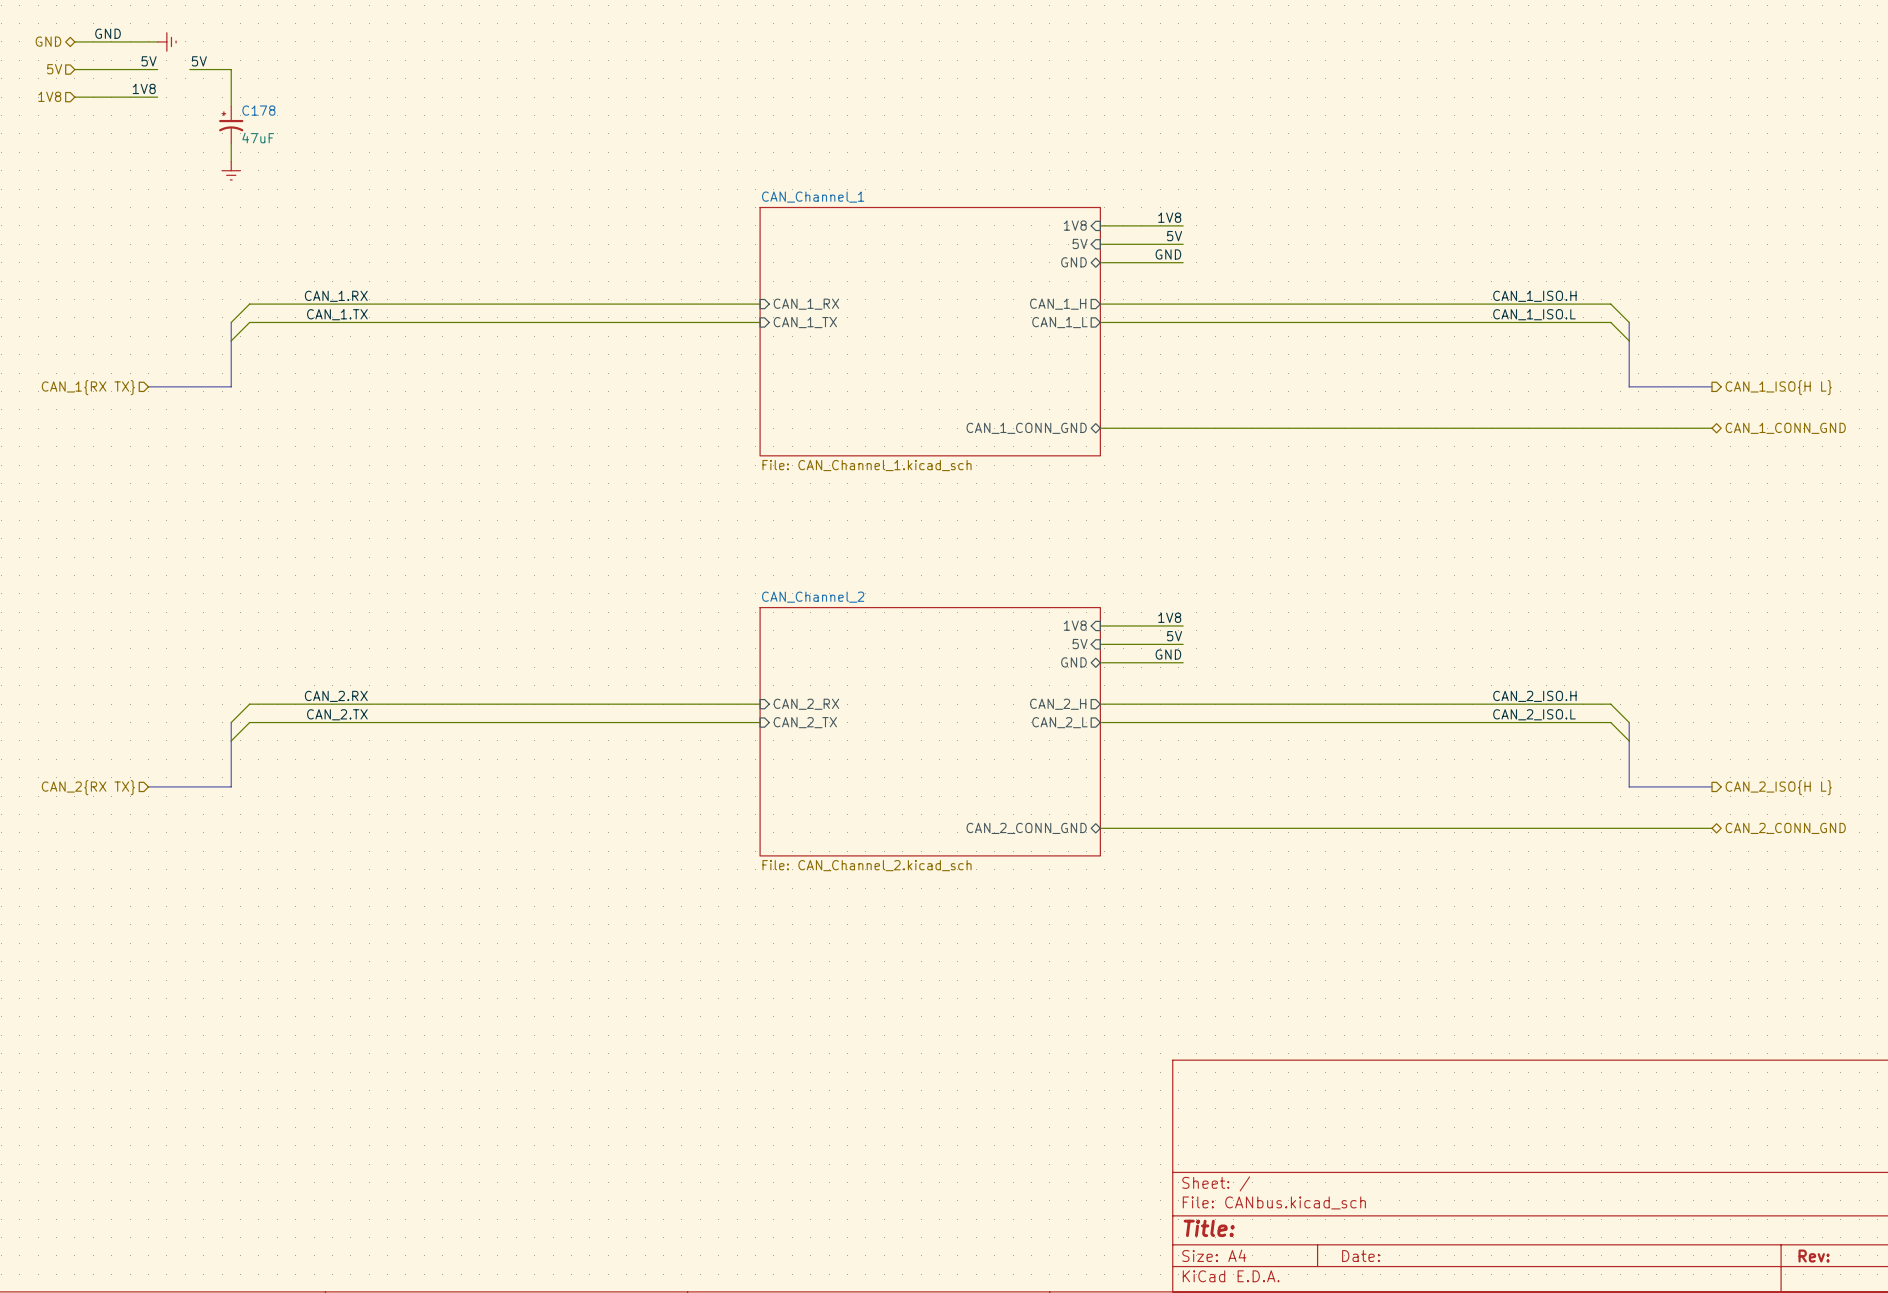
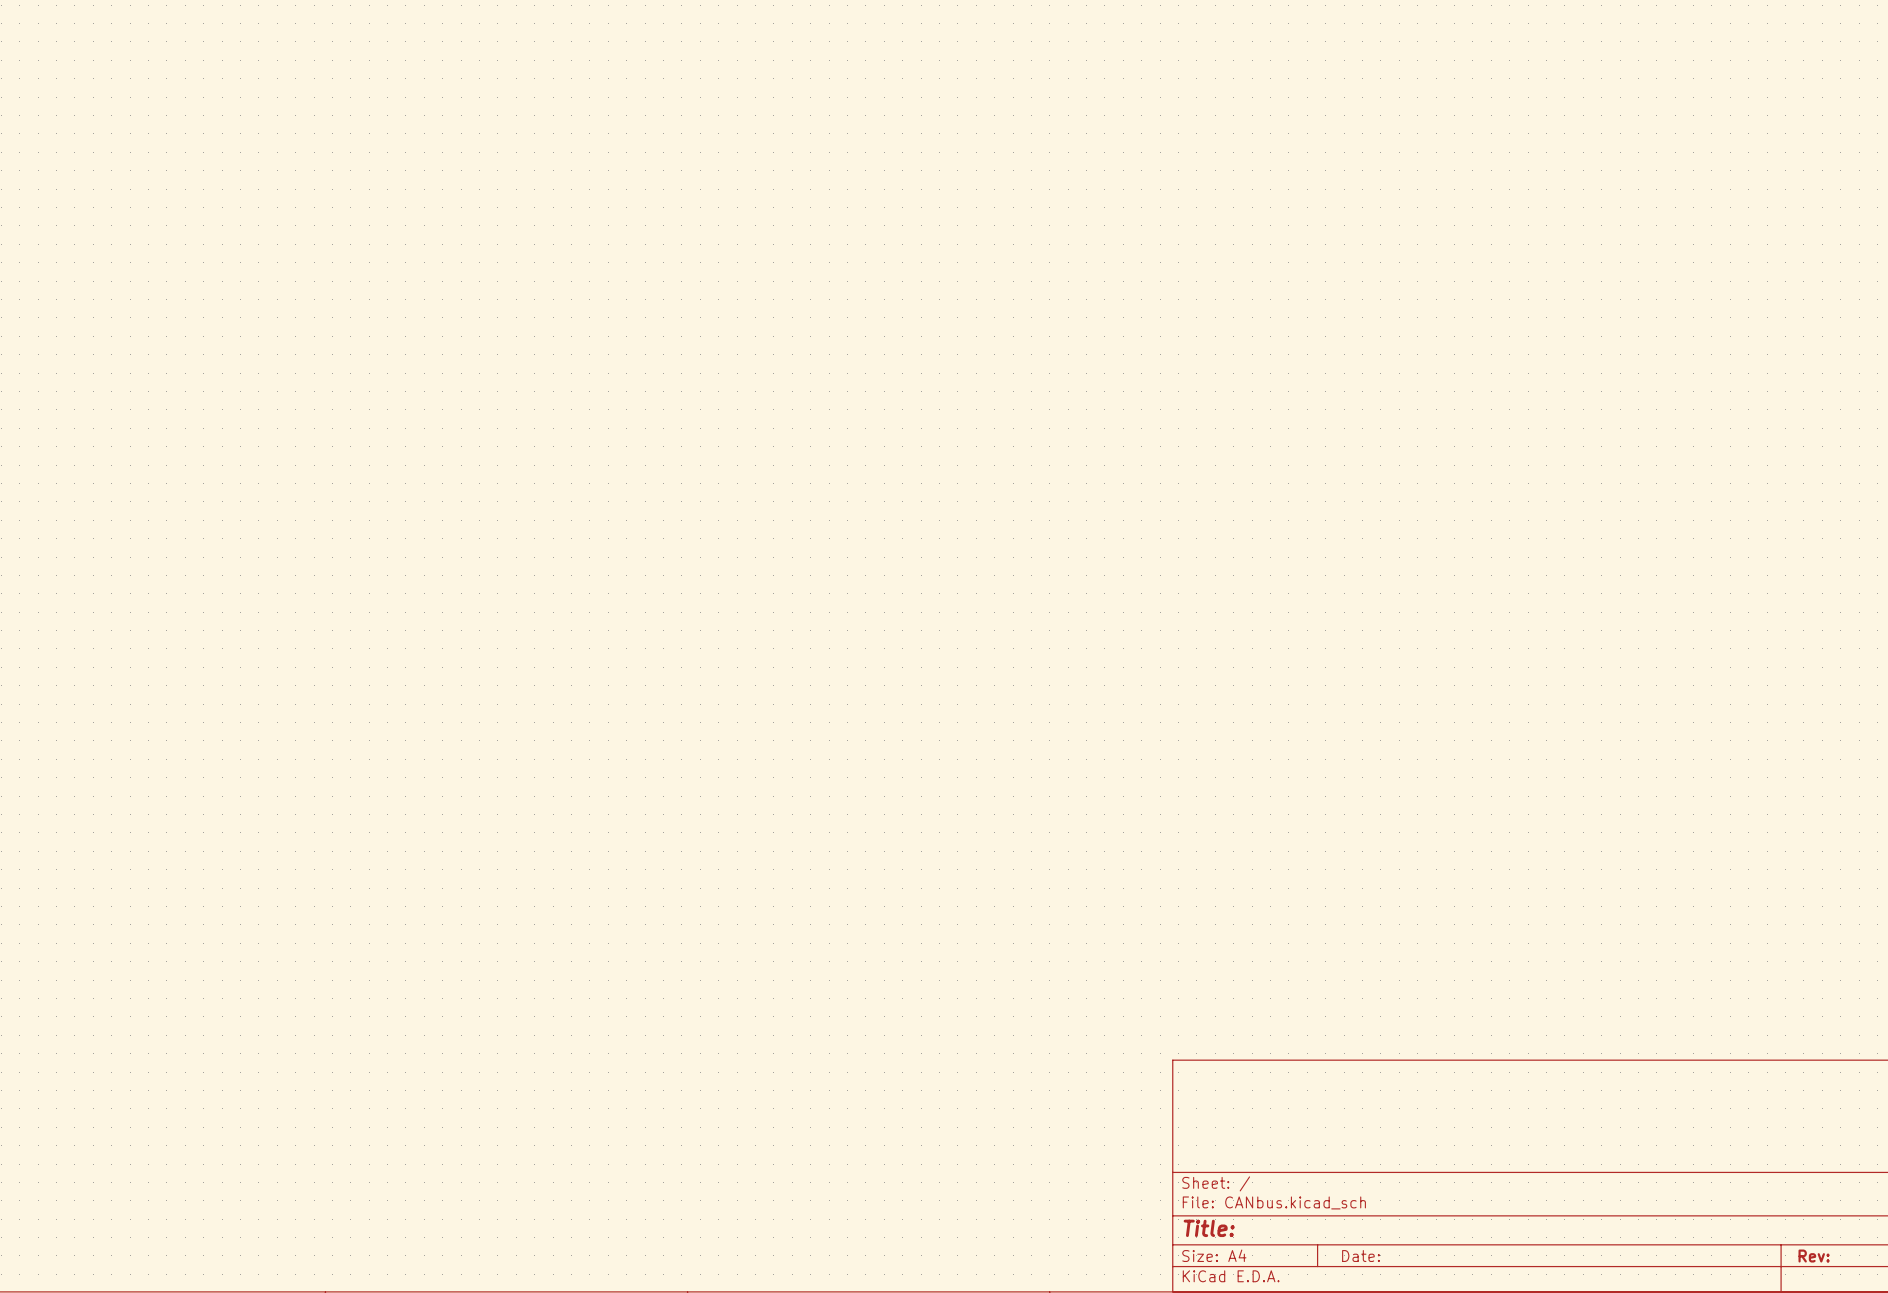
label: GND (108, 33) -> none
hierarchical label: GND (48, 41) -> none
wire: (74, 41) (157, 41) -> none
power symbol: (166, 41) -> none
label: 5V (149, 61) -> none
label: 5V (199, 61) -> none
hierarchical label: 5V (54, 69) -> none
wire: (74, 69) (157, 69) -> none
wire: (189, 69) (231, 69) (231, 106) -> none
label: 1V8 (144, 88) -> none
hierarchical label: 1V8 (49, 96) -> none
wire: (74, 97) (157, 97) -> none
C178: 47uF (231, 124) -> none
wire: (231, 143) (231, 161) -> none
power symbol: (231, 170) -> none
label: 1V8 (1169, 217) -> none
sheet pin: 1V8 (1075, 225) -> none
wire: (1100, 225) (1183, 225) -> none
label: 5V (1174, 236) -> none
sheet pin: 5V (1080, 243) -> none
wire: (1100, 244) (1183, 244) -> none
label: GND (1168, 254) -> none
sheet pin: GND (1073, 262) -> none
wire: (1100, 262) (1183, 262) -> none
label: CAN_1.RX (336, 296) -> none
label: CAN_1_ISO.H (1534, 296) -> none
wire: (249, 304) (760, 304) -> none
wire: (249, 304) (231, 322) -> none
sheet pin: CAN_1_RX (806, 304) -> none
sheet pin: CAN_1_H (1058, 304) -> none
wire: (1100, 304) (1610, 304) -> none
wire: (1610, 304) (1629, 322) -> none
label: CAN_1.TX (337, 314) -> none
label: CAN_1_ISO.L (1534, 314) -> none
bus: (231, 322) (231, 386) (148, 386) -> none
wire: (249, 322) (231, 340) -> none
wire: (249, 322) (760, 322) -> none
sheet pin: CAN_1_TX (805, 322) -> none
sheet pin: CAN_1_L (1059, 322) -> none
wire: (1100, 322) (1610, 322) -> none
wire: (1610, 322) (1629, 340) -> none
bus: (1629, 322) (1629, 386) (1711, 386) -> none
sheet CAN_Channel_1: File: CAN_Channel_1.kicad_sch (930, 331) -> none
hierarchical label: CAN_1{RX TX} (88, 387) -> none
hierarchical label: CAN_1_ISO{H L} (1778, 387) -> none
sheet pin: CAN_1_CONN_GND (1026, 428) -> none
wire: (1100, 428) (1711, 428) -> none
hierarchical label: CAN_1_CONN_GND (1785, 428) -> none
label: 1V8 (1169, 617) -> none
sheet pin: 1V8 (1075, 625) -> none
wire: (1100, 625) (1183, 625) -> none
label: 5V (1174, 636) -> none
sheet pin: 5V (1080, 644) -> none
wire: (1100, 644) (1183, 644) -> none
label: GND (1168, 654) -> none
sheet pin: GND (1073, 662) -> none
wire: (1100, 662) (1183, 662) -> none
label: CAN_2.RX (336, 696) -> none
label: CAN_2_ISO.H (1534, 696) -> none
wire: (760, 704) (249, 704) (231, 722) -> none
sheet pin: CAN_2_RX (806, 704) -> none
sheet pin: CAN_2_H (1058, 704) -> none
wire: (1100, 704) (1610, 704) (1629, 722) -> none
label: CAN_2.TX (337, 714) -> none
label: CAN_2_ISO.L (1534, 714) -> none
bus: (231, 722) (231, 786) (148, 786) -> none
wire: (760, 722) (249, 722) (231, 740) -> none
sheet pin: CAN_2_TX (805, 722) -> none
sheet pin: CAN_2_L (1059, 722) -> none
wire: (1100, 722) (1610, 722) (1629, 740) -> none
bus: (1629, 722) (1629, 786) (1711, 786) -> none
sheet CAN_Channel_2: File: CAN_Channel_2.kicad_sch (930, 731) -> none
hierarchical label: CAN_2{RX TX} (88, 787) -> none
hierarchical label: CAN_2_ISO{H L} (1778, 787) -> none
sheet pin: CAN_2_CONN_GND (1026, 828) -> none
wire: (1100, 828) (1711, 828) -> none
hierarchical label: CAN_2_CONN_GND (1785, 828) -> none

